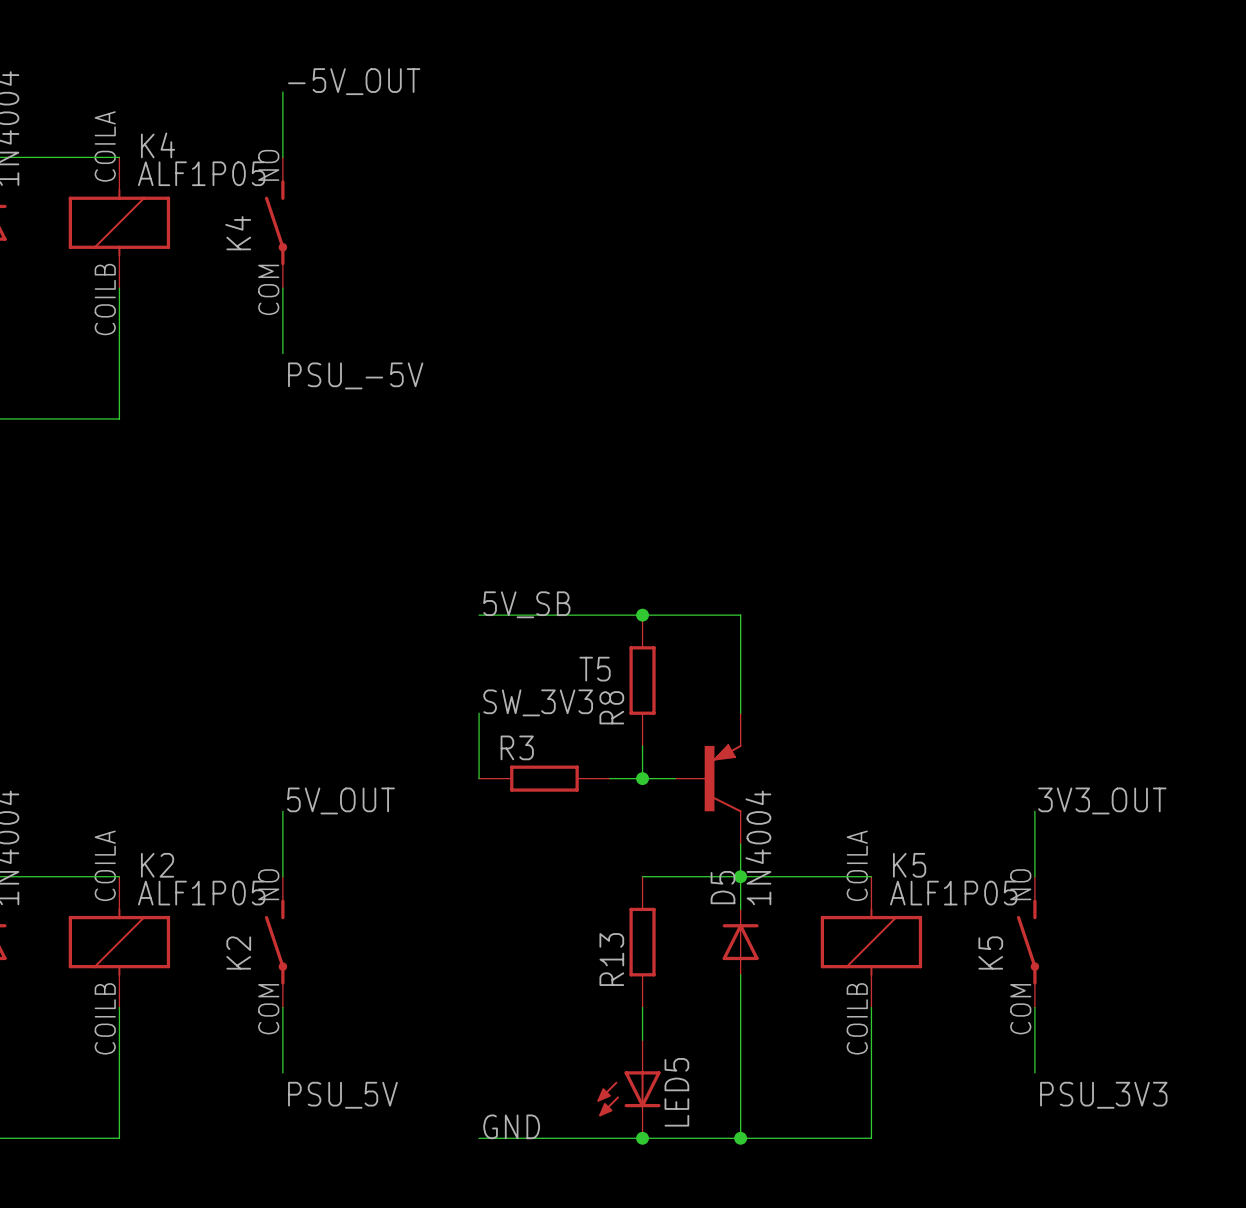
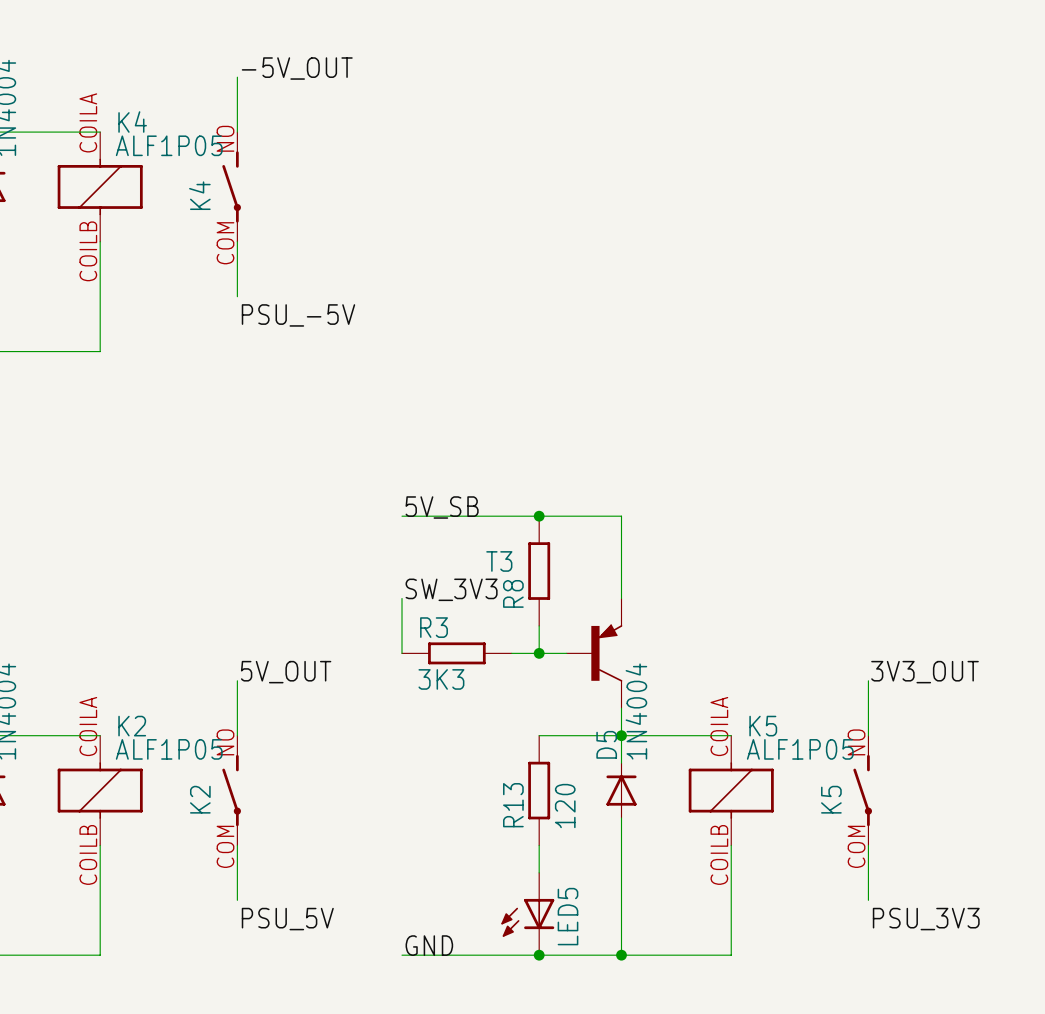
T5 name: T5 (595, 669) -> T3 (499, 561)
R3 value: none -> 3K3 (441, 679)
R13 value: none -> 120 (565, 806)

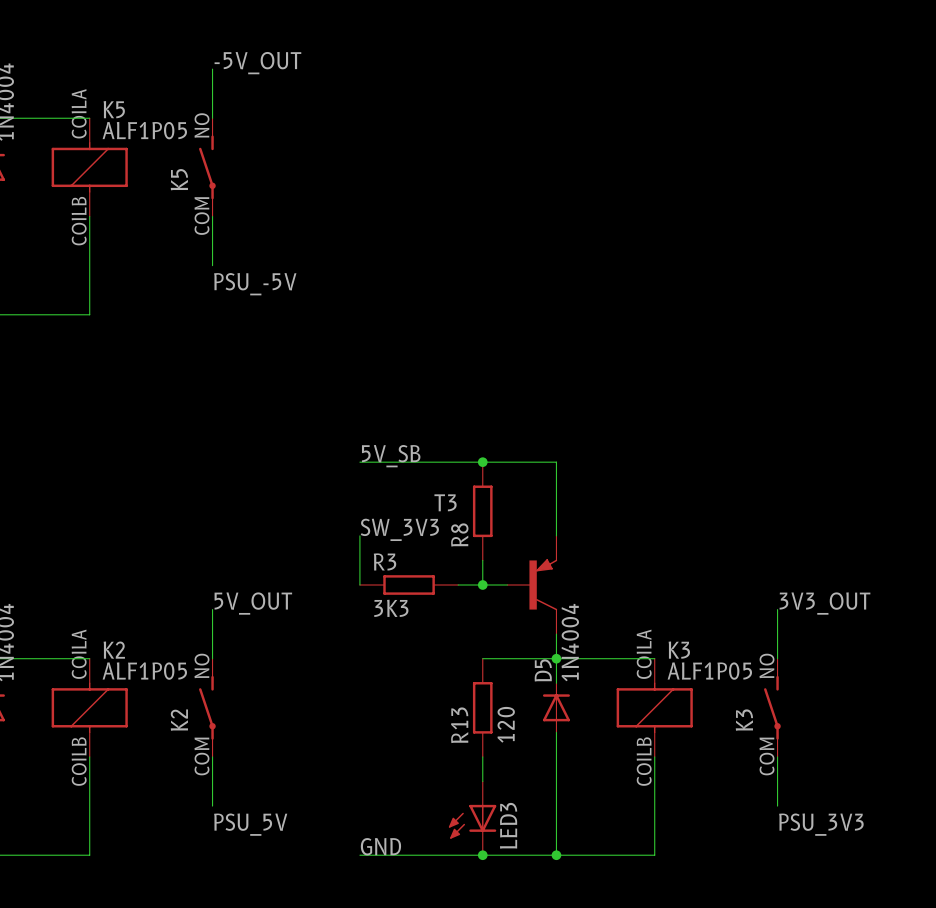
K4 name: K4 (132, 122) -> K5 (114, 109)
K4 name: K4 (199, 195) -> K5 (179, 179)
K5 name: K5 (763, 726) -> K3 (679, 650)
K5 name: K5 (831, 799) -> K3 (744, 720)
LED5 name: LED5 (567, 916) -> LED3 (508, 825)

